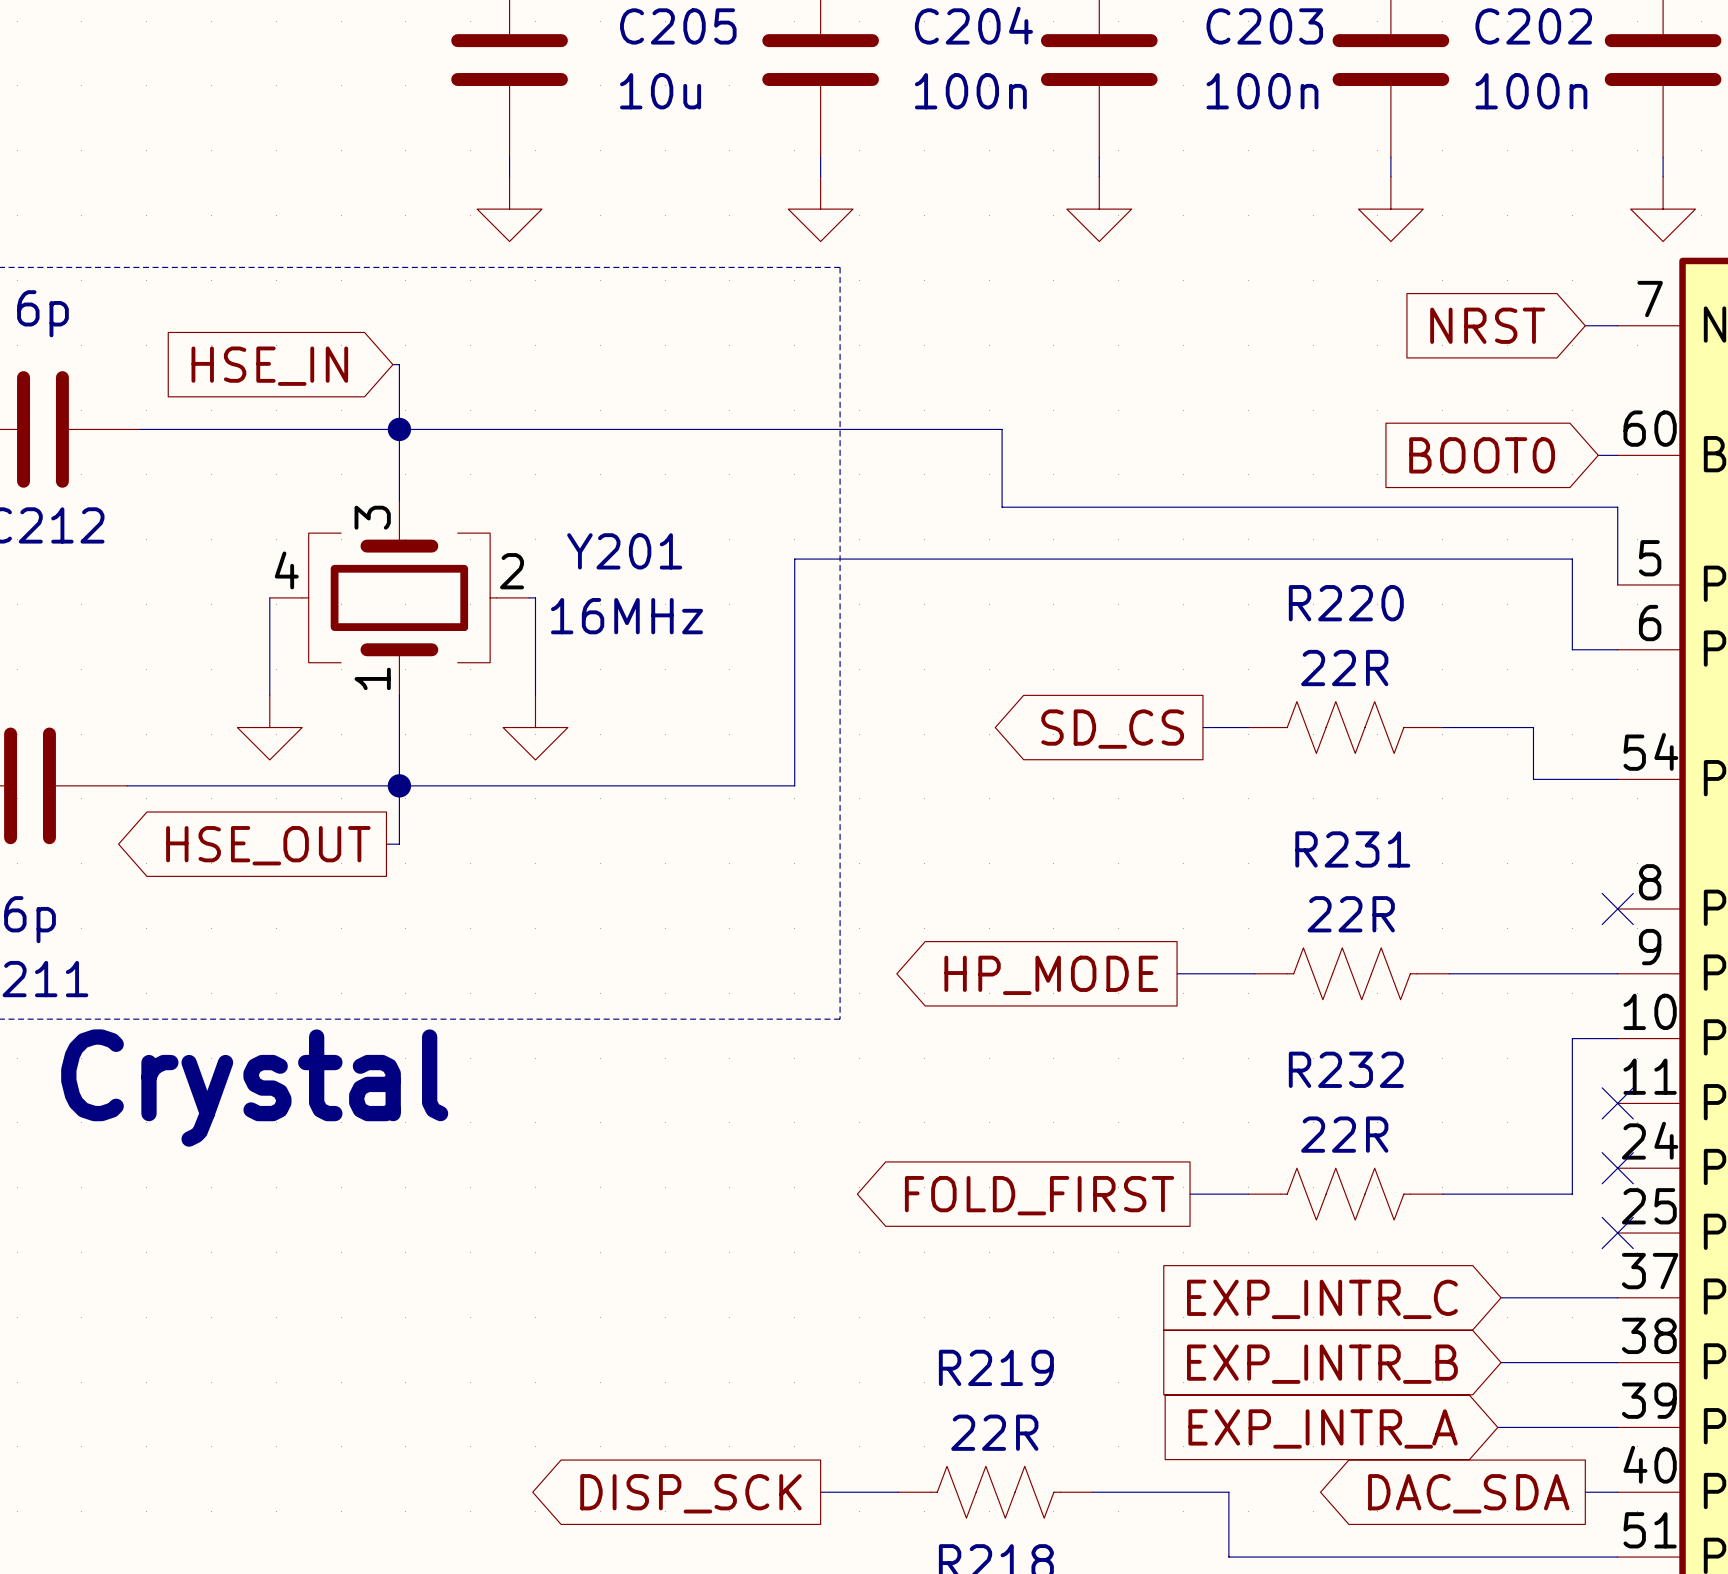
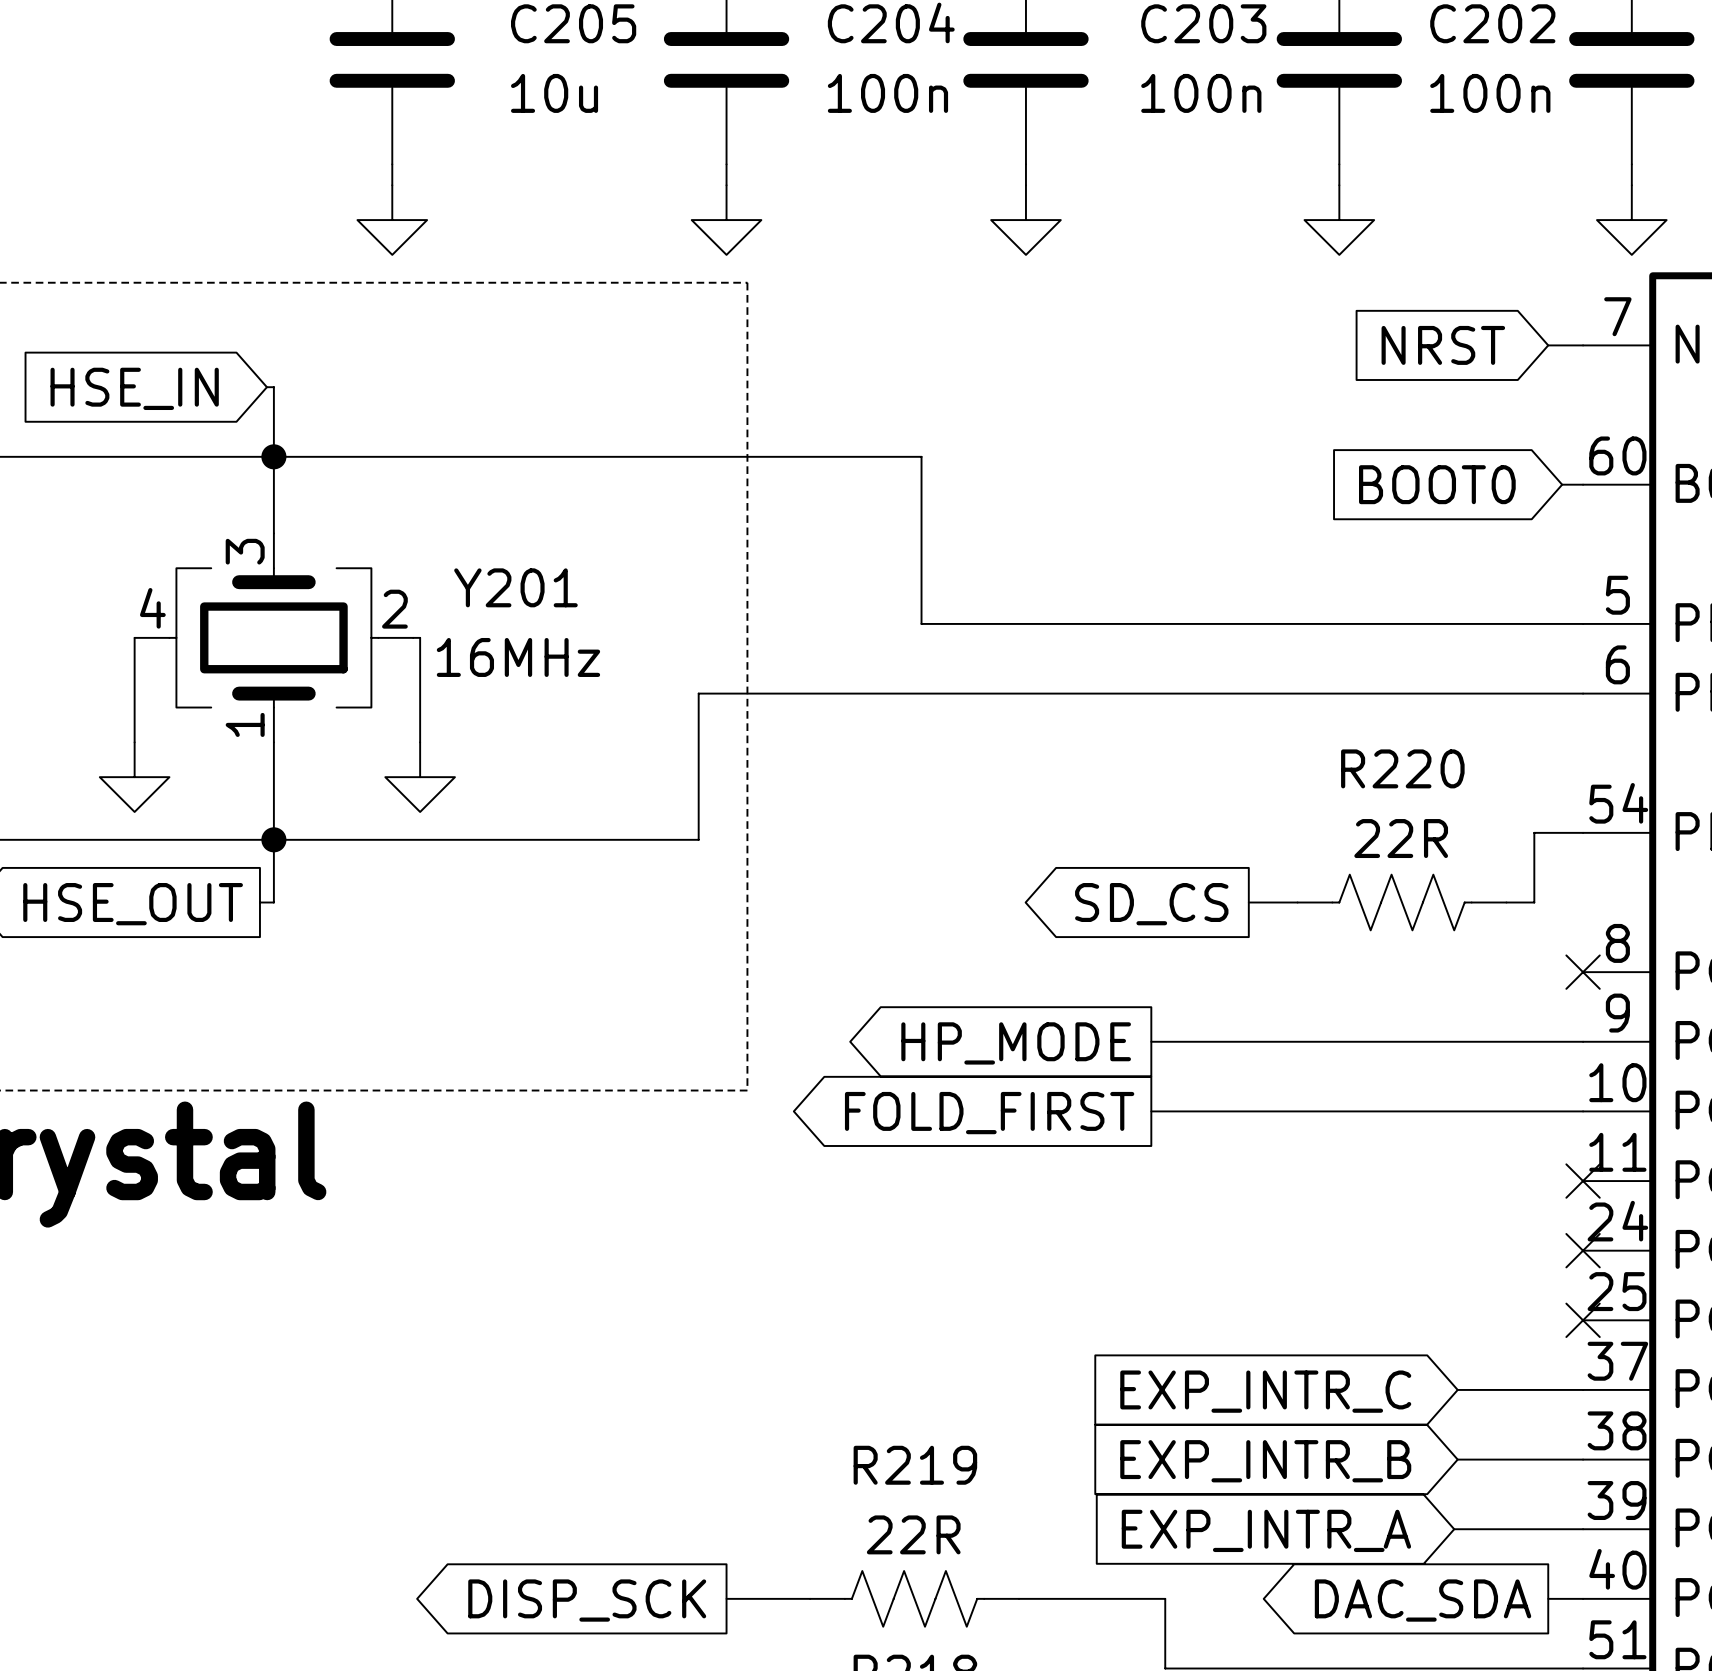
wire: (1002, 507) (1617, 507) (1617, 584) -> (921, 540) (921, 623) (1583, 623)
wire: (794, 649) (794, 559) (1572, 559) (1572, 649) -> (698, 693) (1534, 693)
wire: (1202, 727) (1248, 727) -> (1248, 902) (1297, 902)
R220 position: (1345, 727) -> (1402, 902)
wire: (1442, 727) (1533, 727) (1533, 779) (1572, 779) -> (1506, 902) (1534, 902) (1534, 832)
global label position: SD_CS (1112, 729) -> SD_CS (1151, 904)
wire: (1177, 973) (1215, 973) -> none
wire: none -> (1193, 1041) (1402, 1041)
R231: 22R (1352, 973) -> none
global label position: HP_MODE (1051, 975) -> HP_MODE (1016, 1043)
wire: (1572, 1038) (1572, 1194) (1442, 1194) -> (1534, 1111) (1151, 1111)
wire: (1190, 1194) (1248, 1194) -> none
R232: 22R (1345, 1194) -> none
global label position: FOLD_FIRST (1039, 1195) -> FOLD_FIRST (989, 1113)

